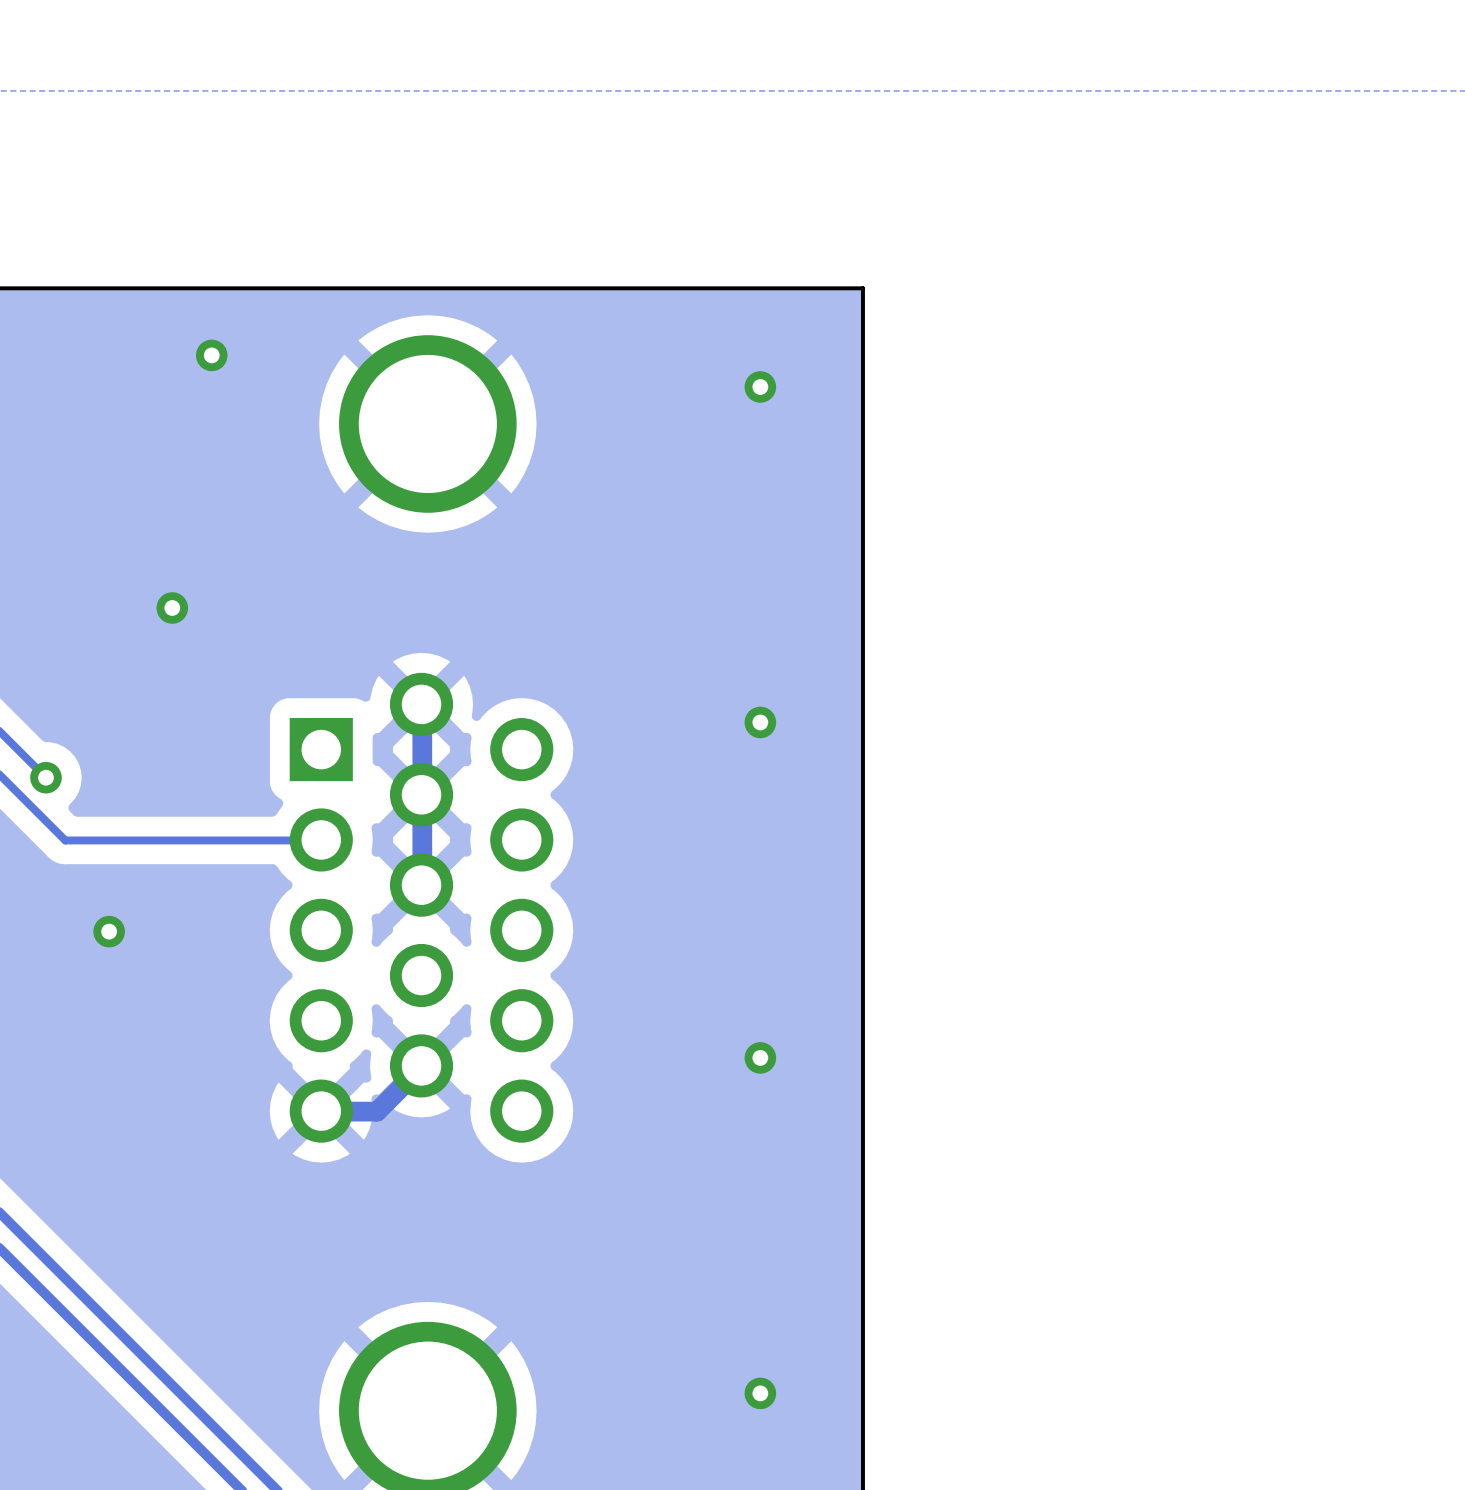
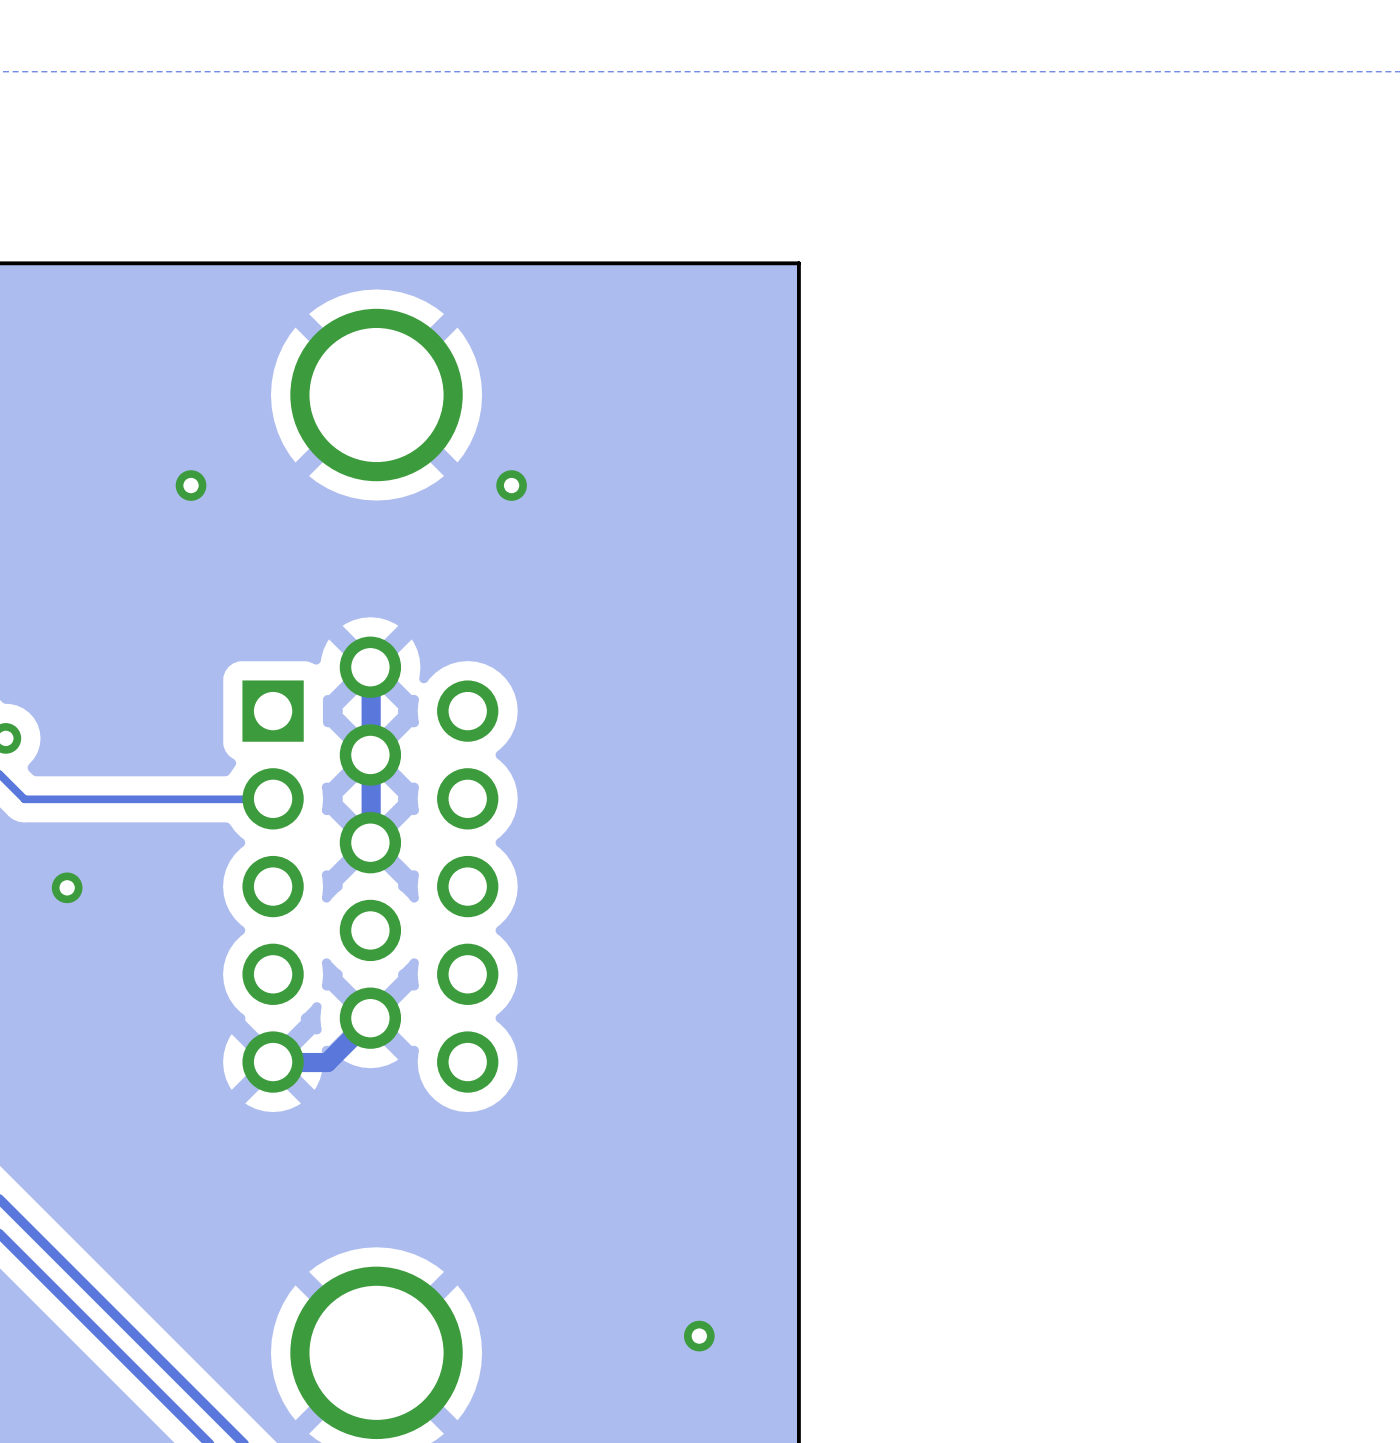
via: (211, 355) -> none
via: (760, 386) -> none
via: none -> (191, 485)
via: none -> (511, 485)
via: (172, 608) -> none
via: (760, 722) -> none
via: (760, 1057) -> none

